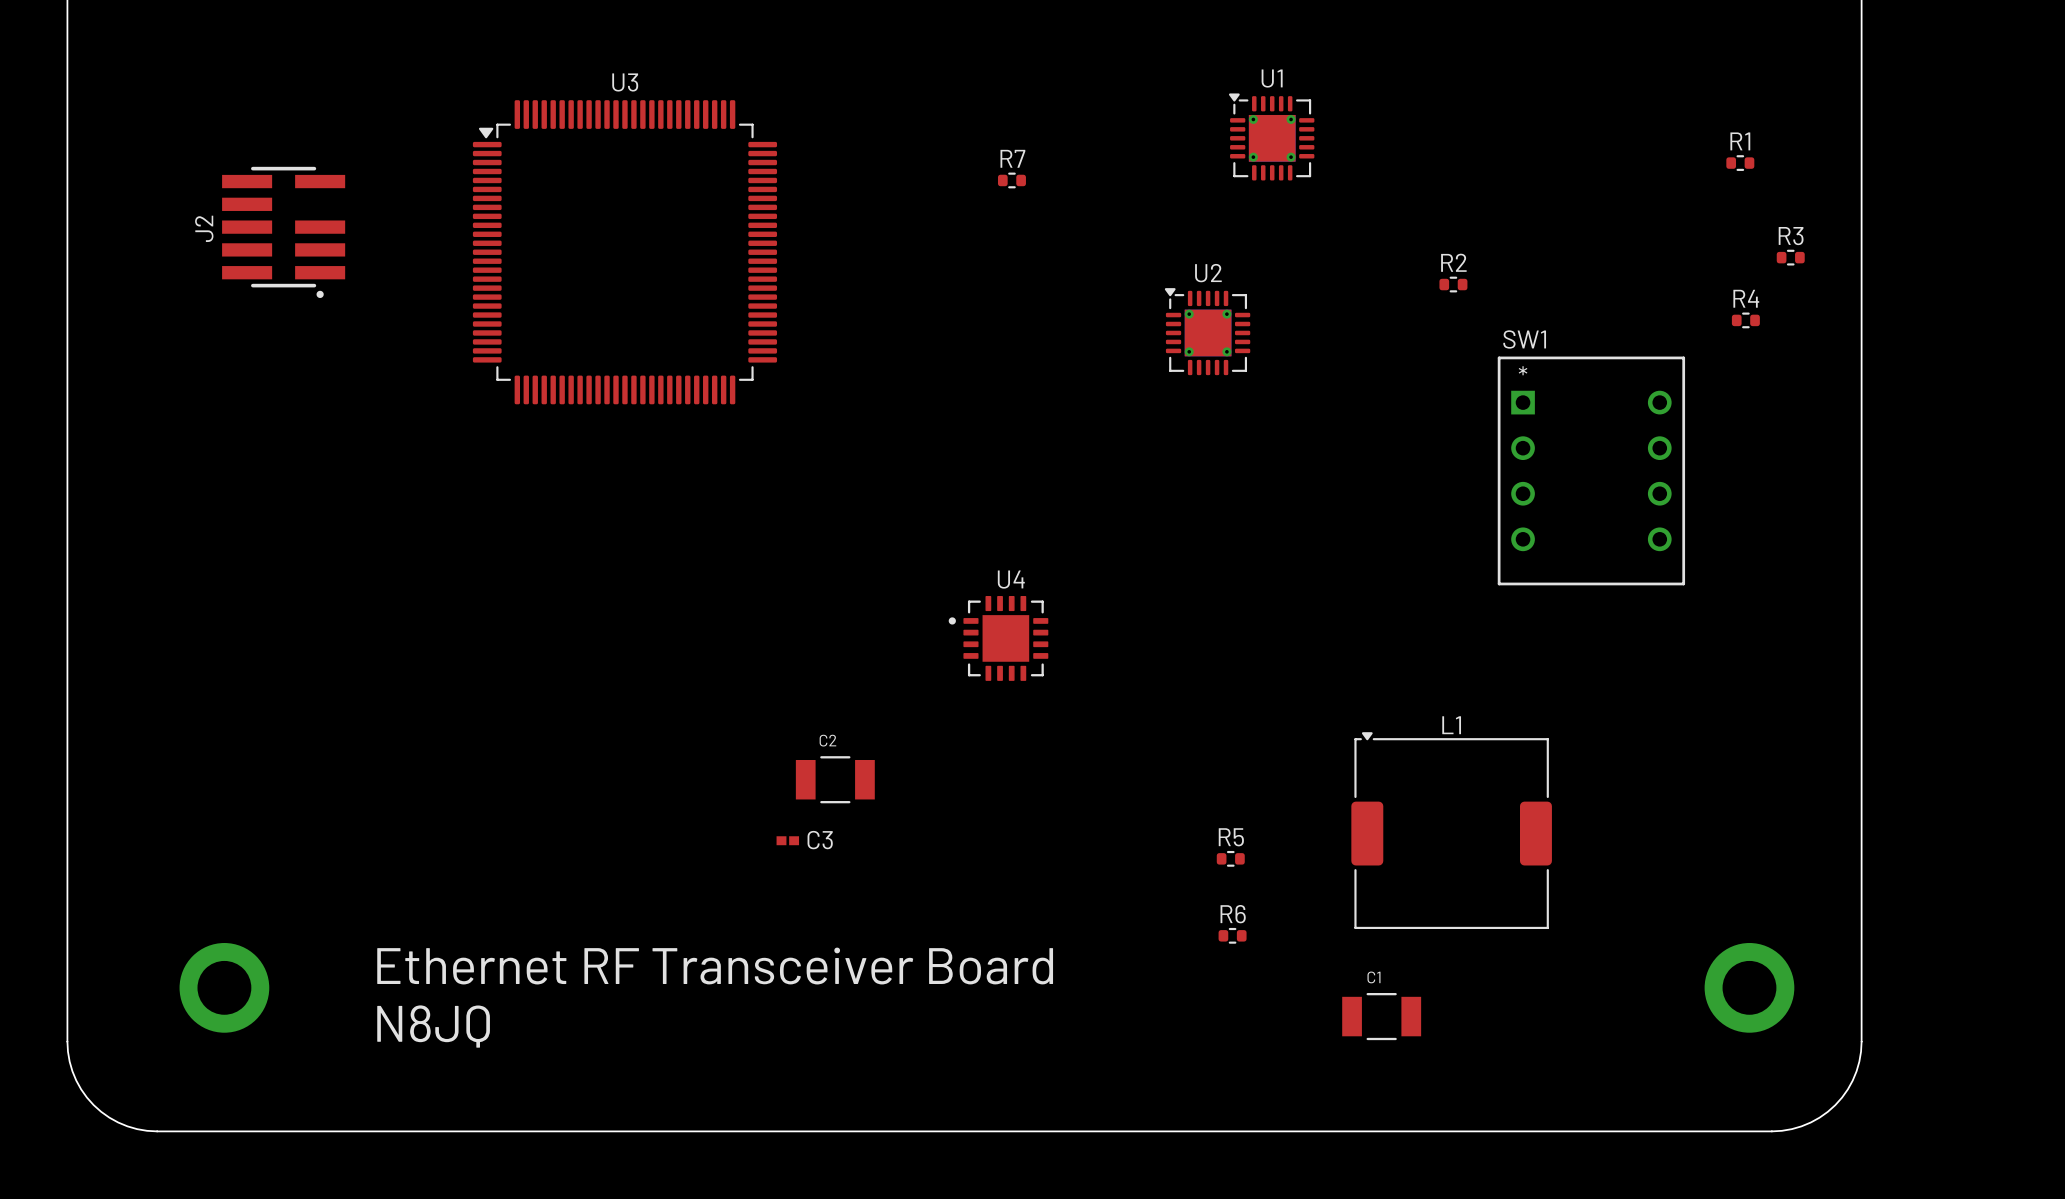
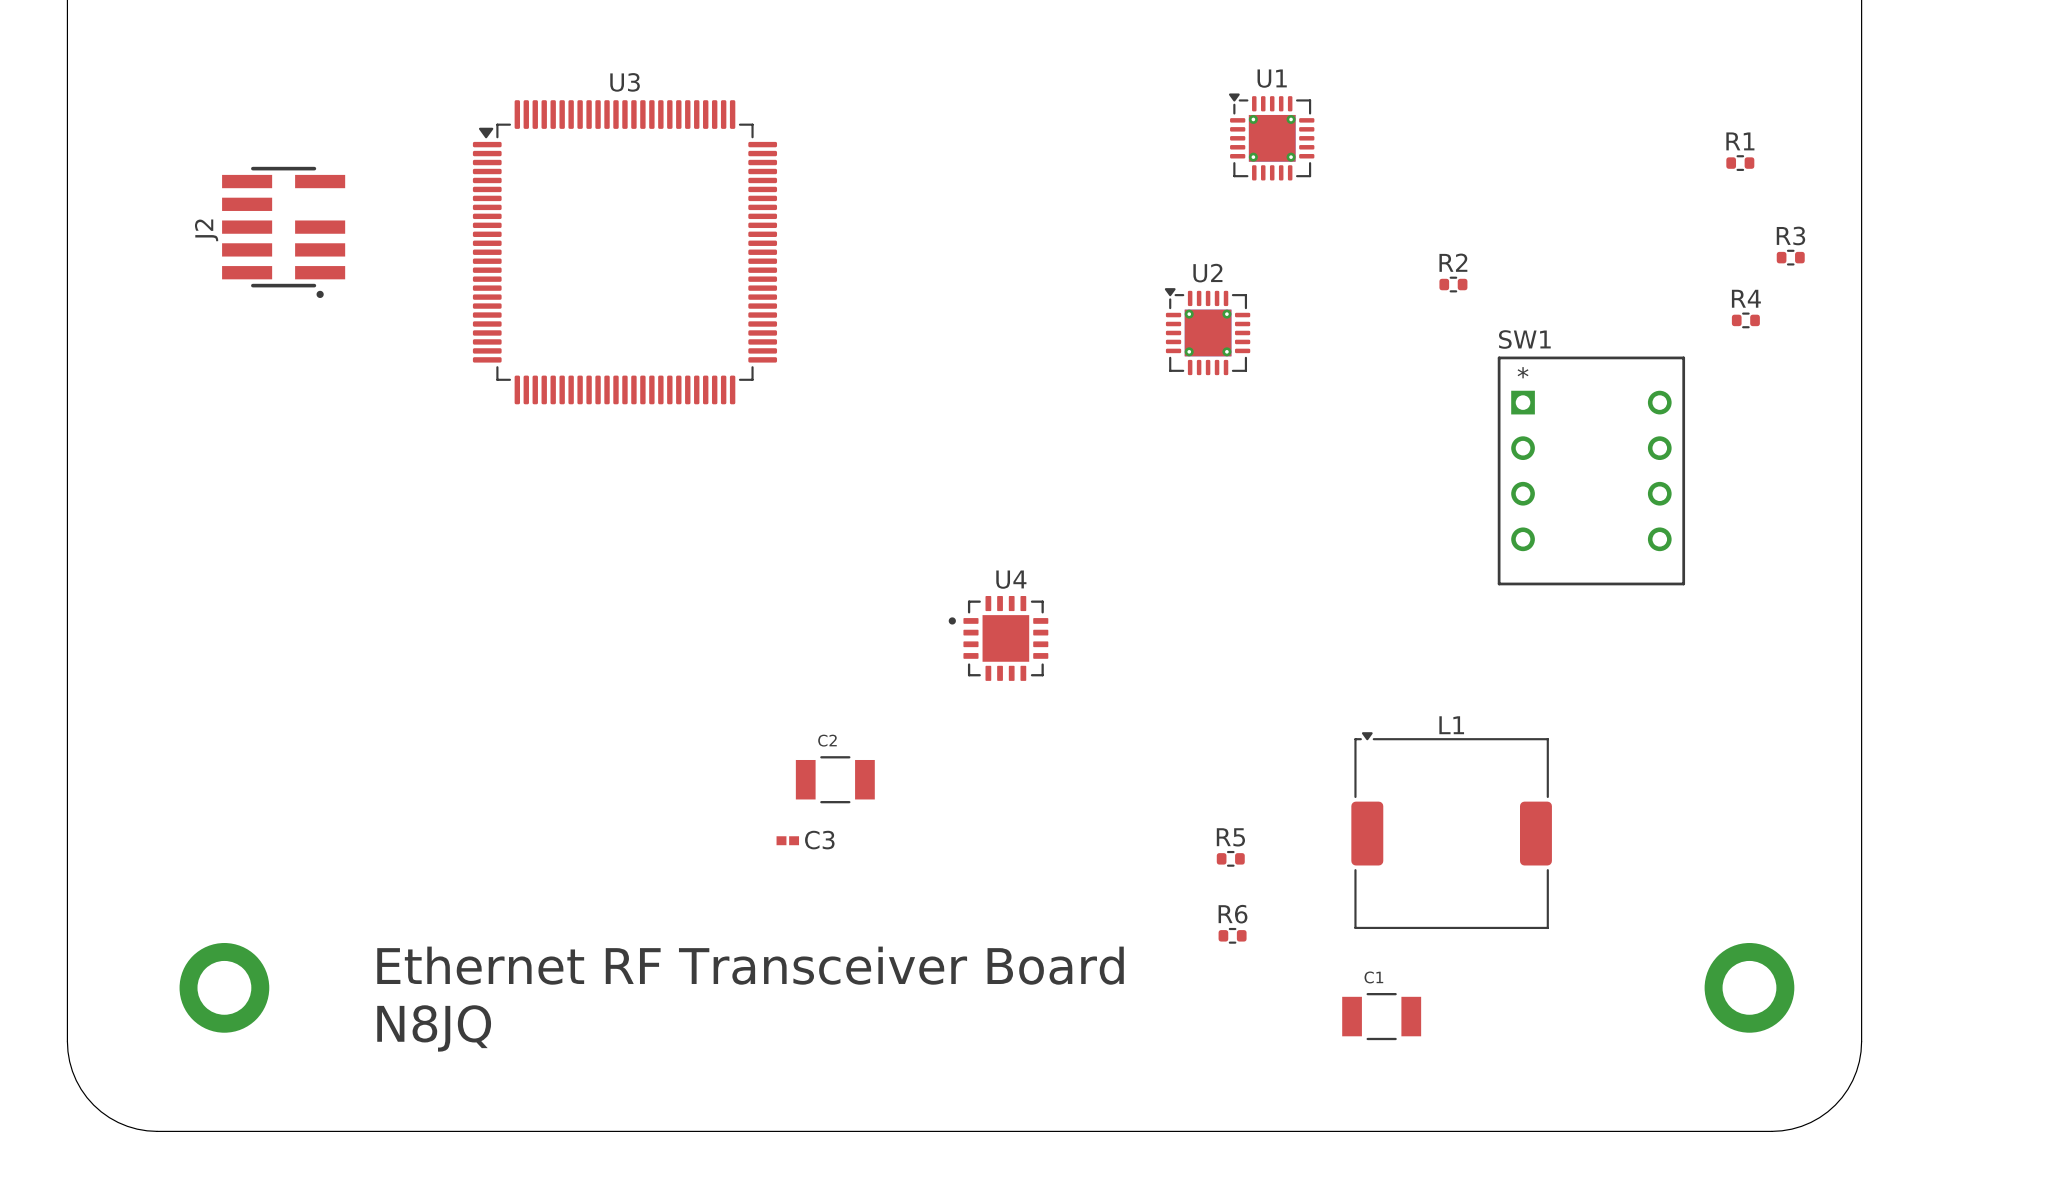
R7: (1011, 180) -> none

